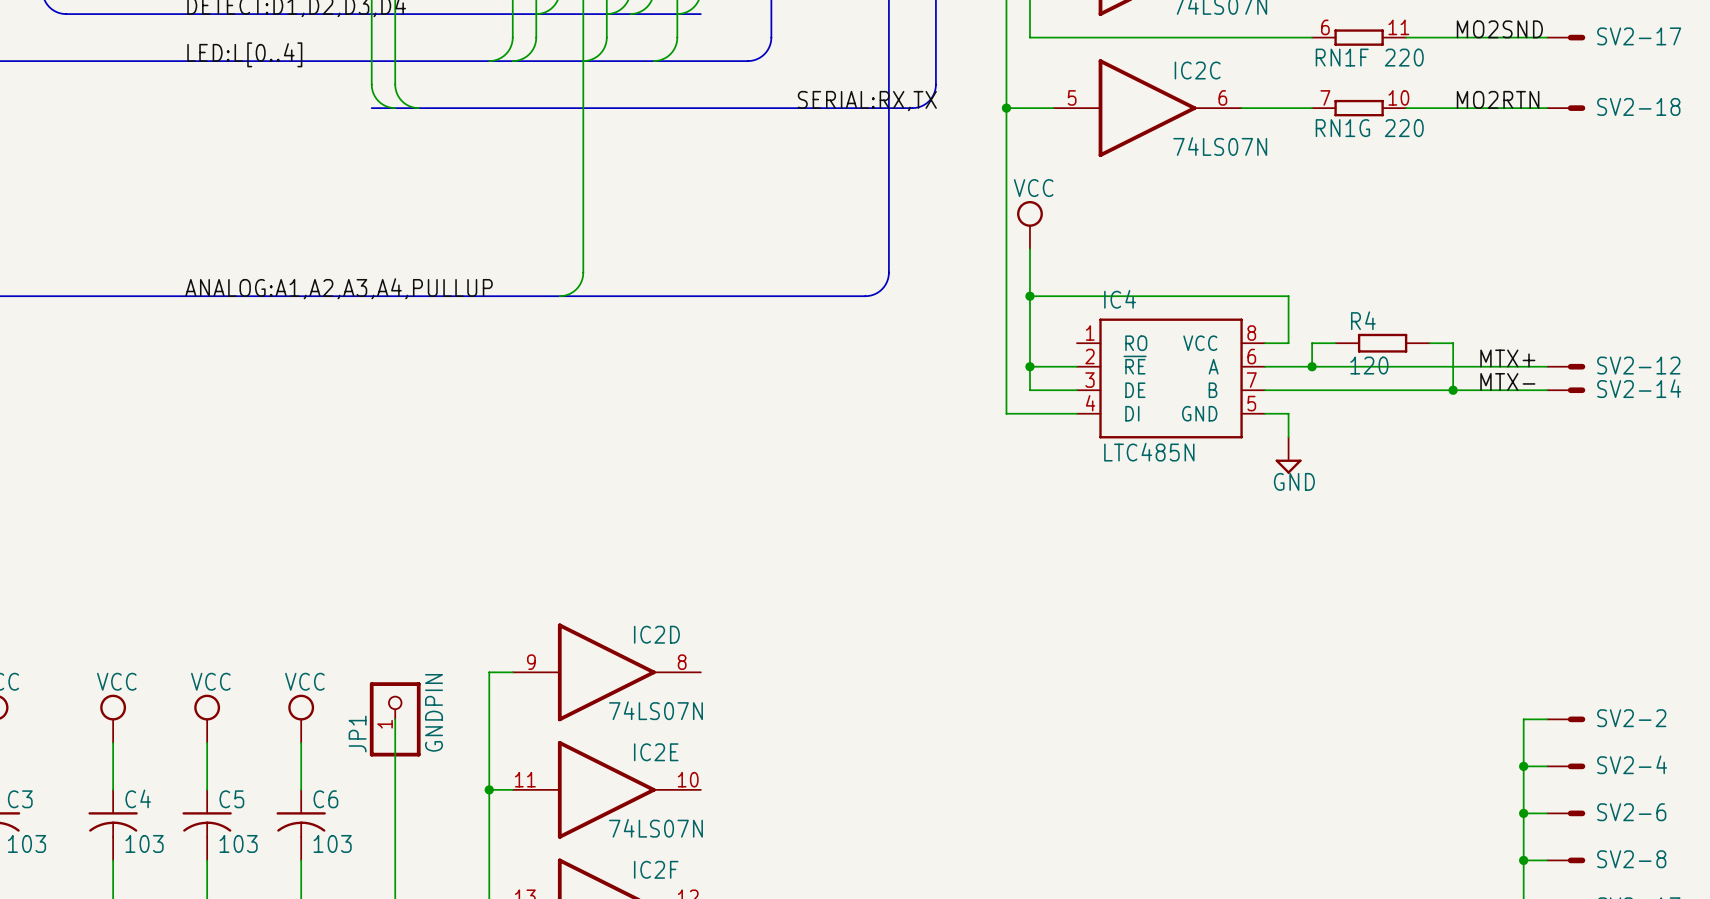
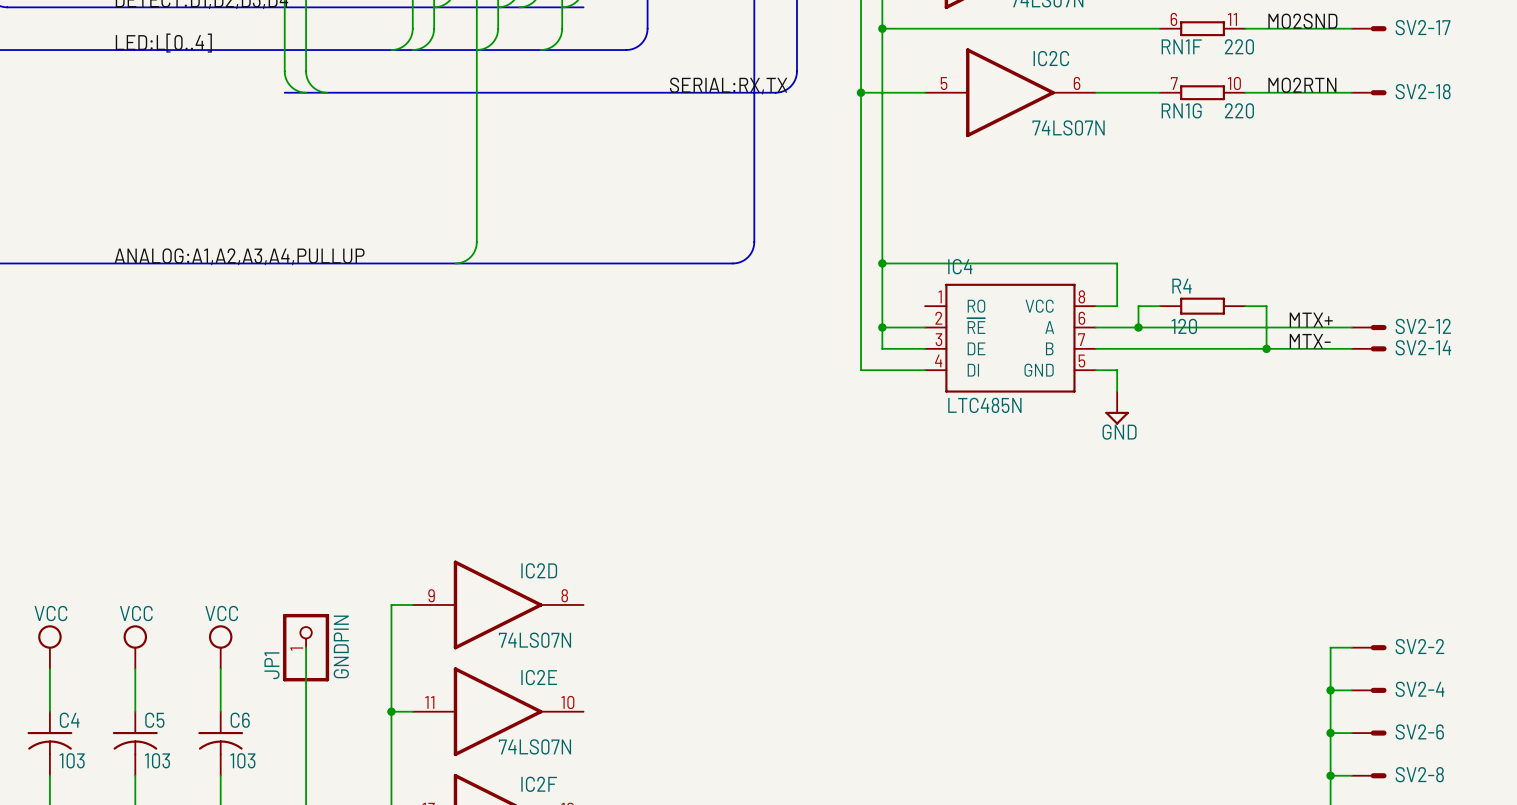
wire: none -> (882, 28) (882, 220)
junction: none -> (882, 28)
RN1F position: (1359, 37) -> (1202, 28)
IC2C position: (1147, 108) -> (1010, 92)
RN1G position: (1359, 108) -> (1202, 92)
power symbol: VCC (1029, 225) -> none

